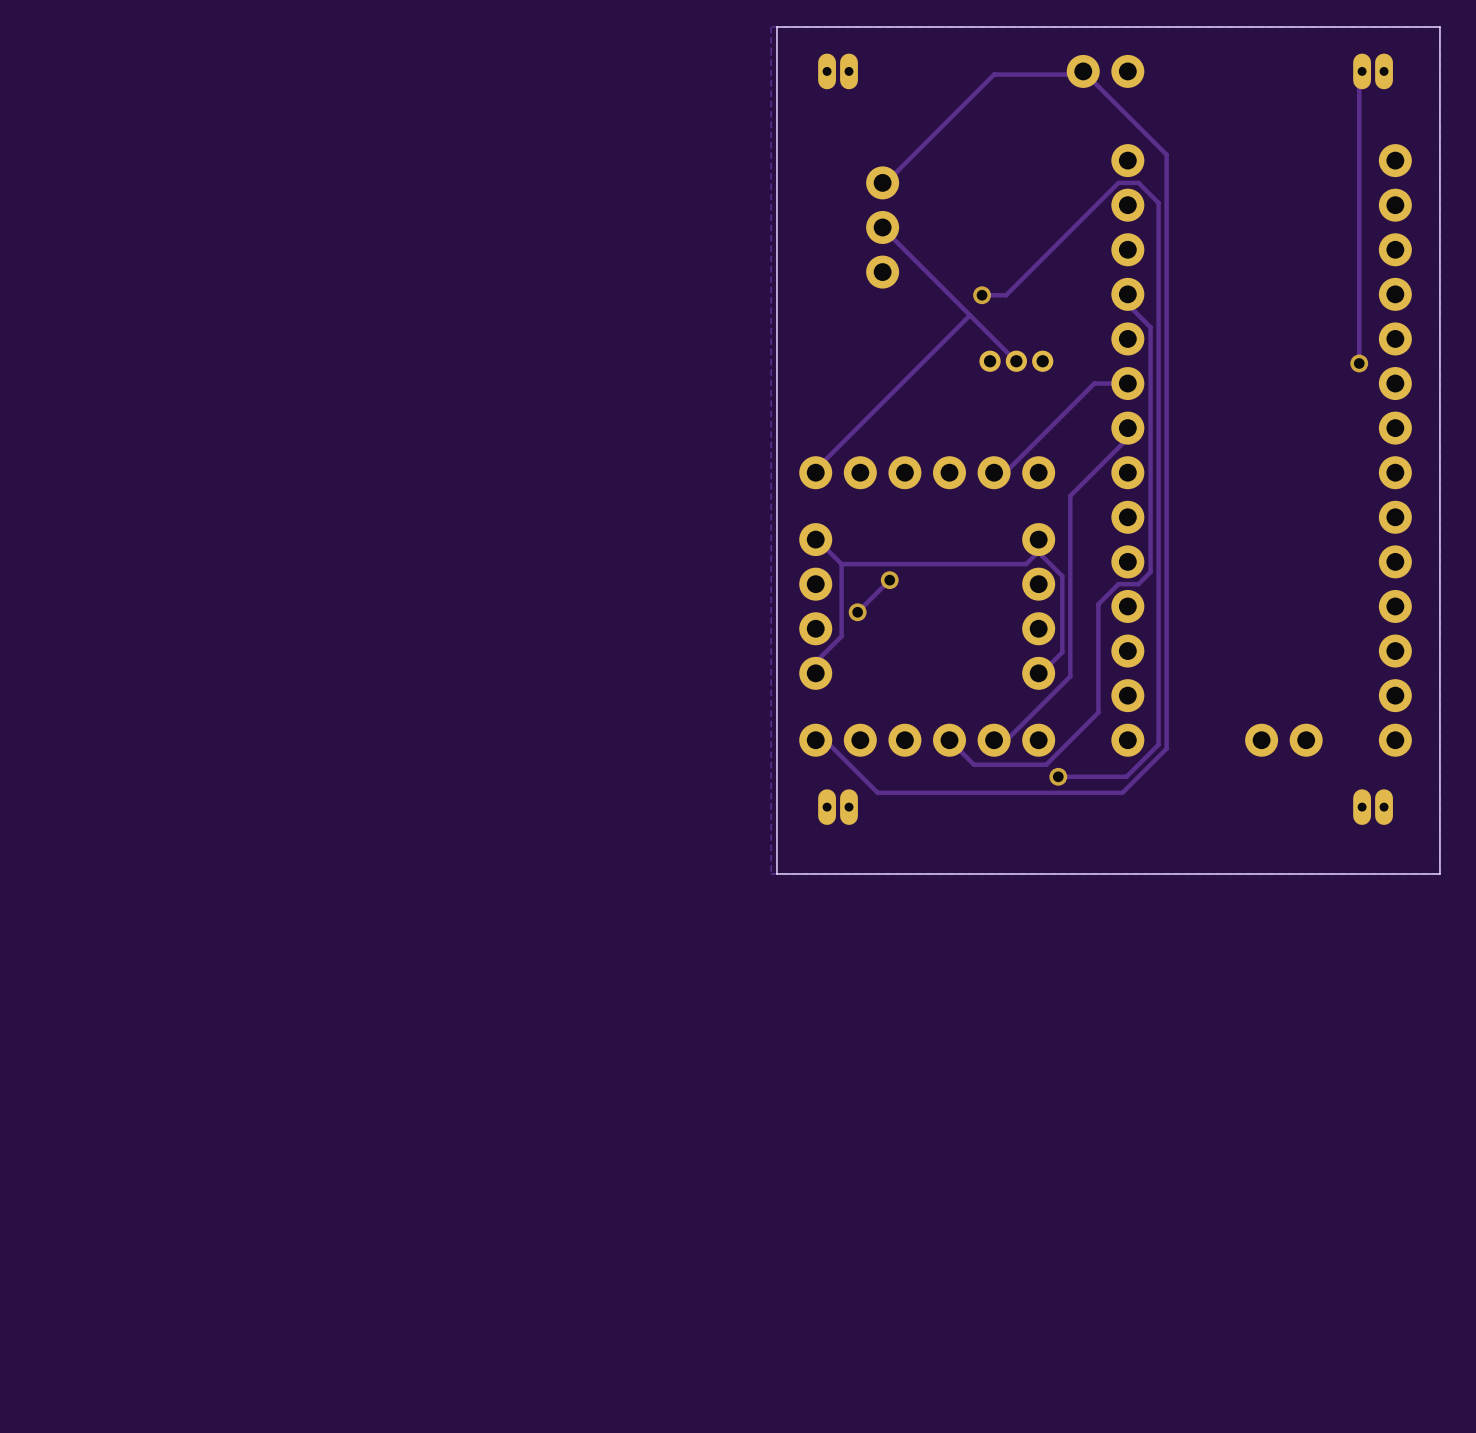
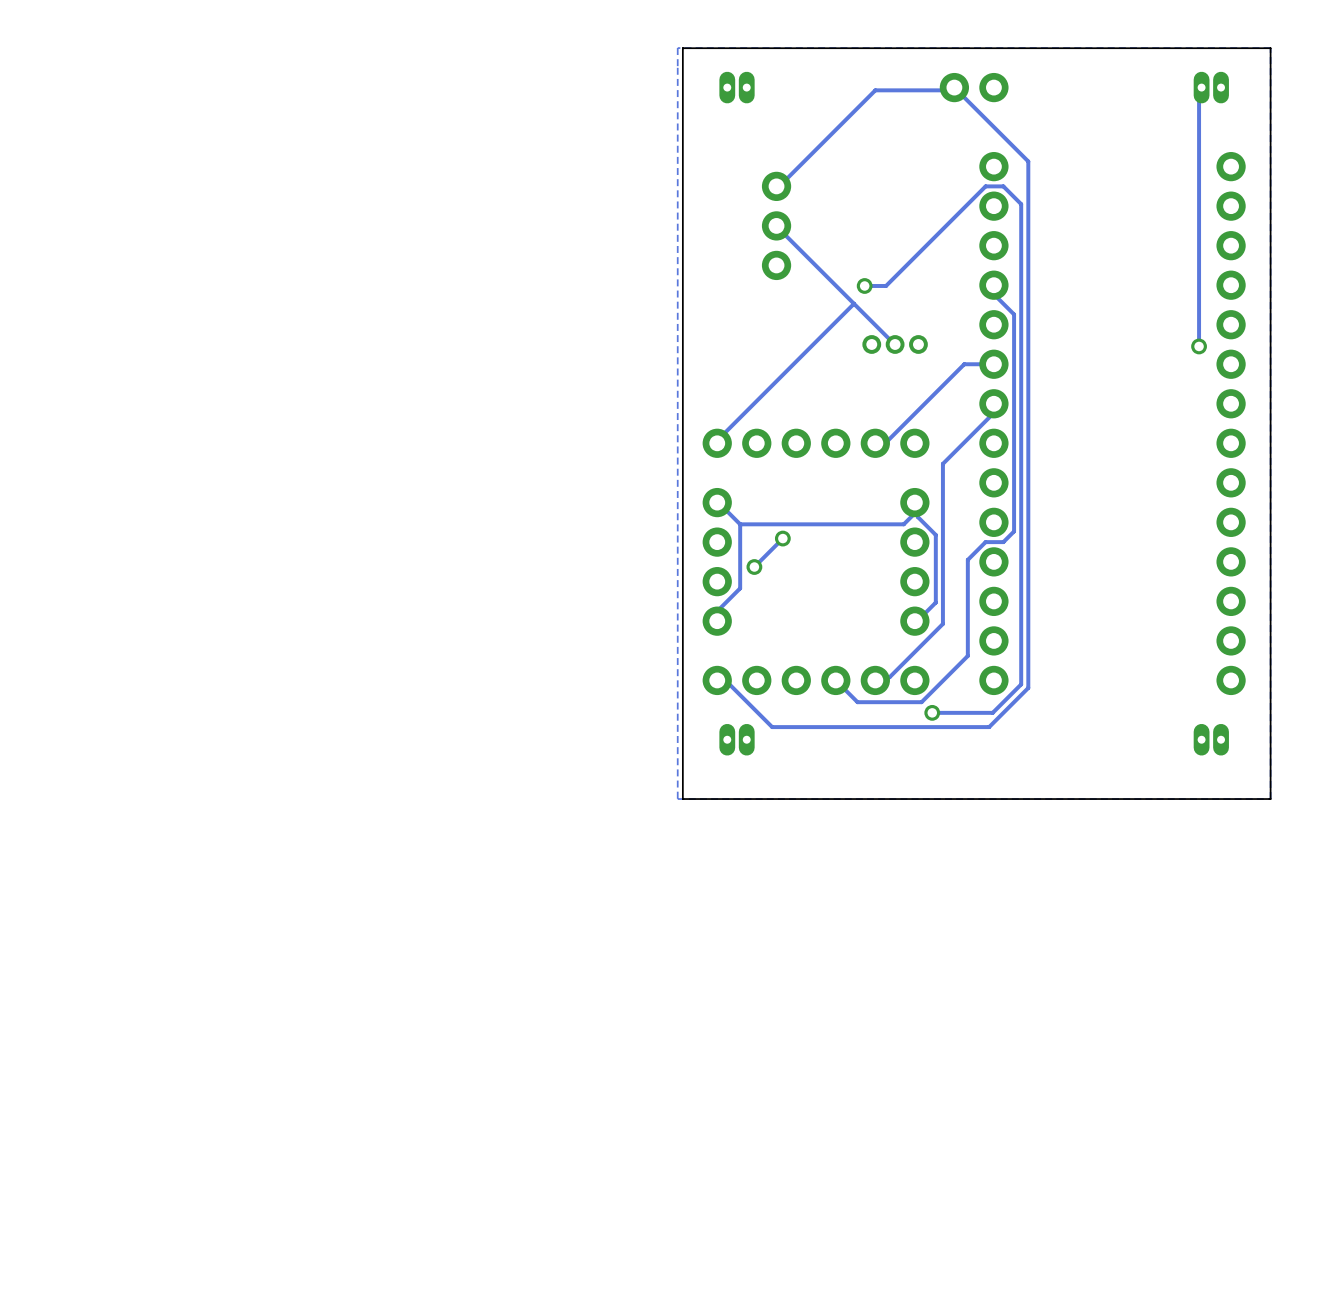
part: (1283, 740) -> none

